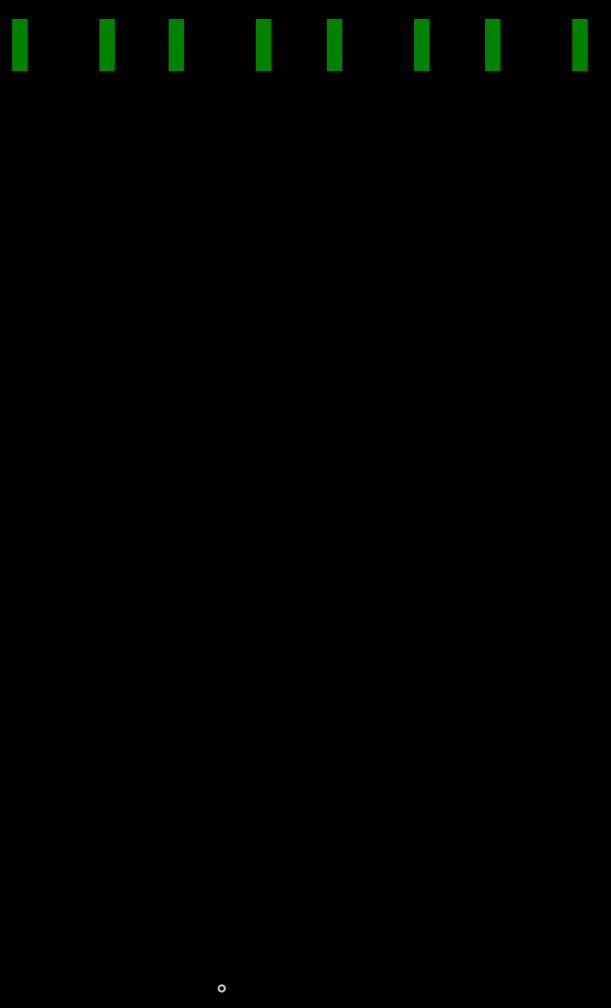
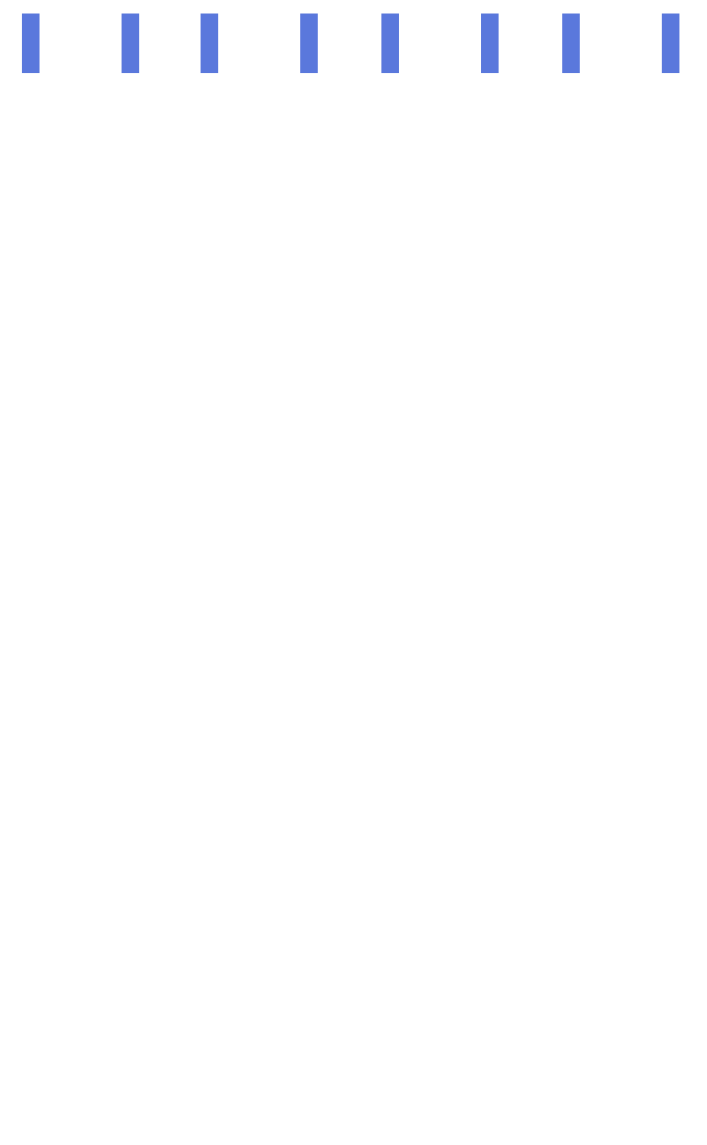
via: (221, 988) -> none

